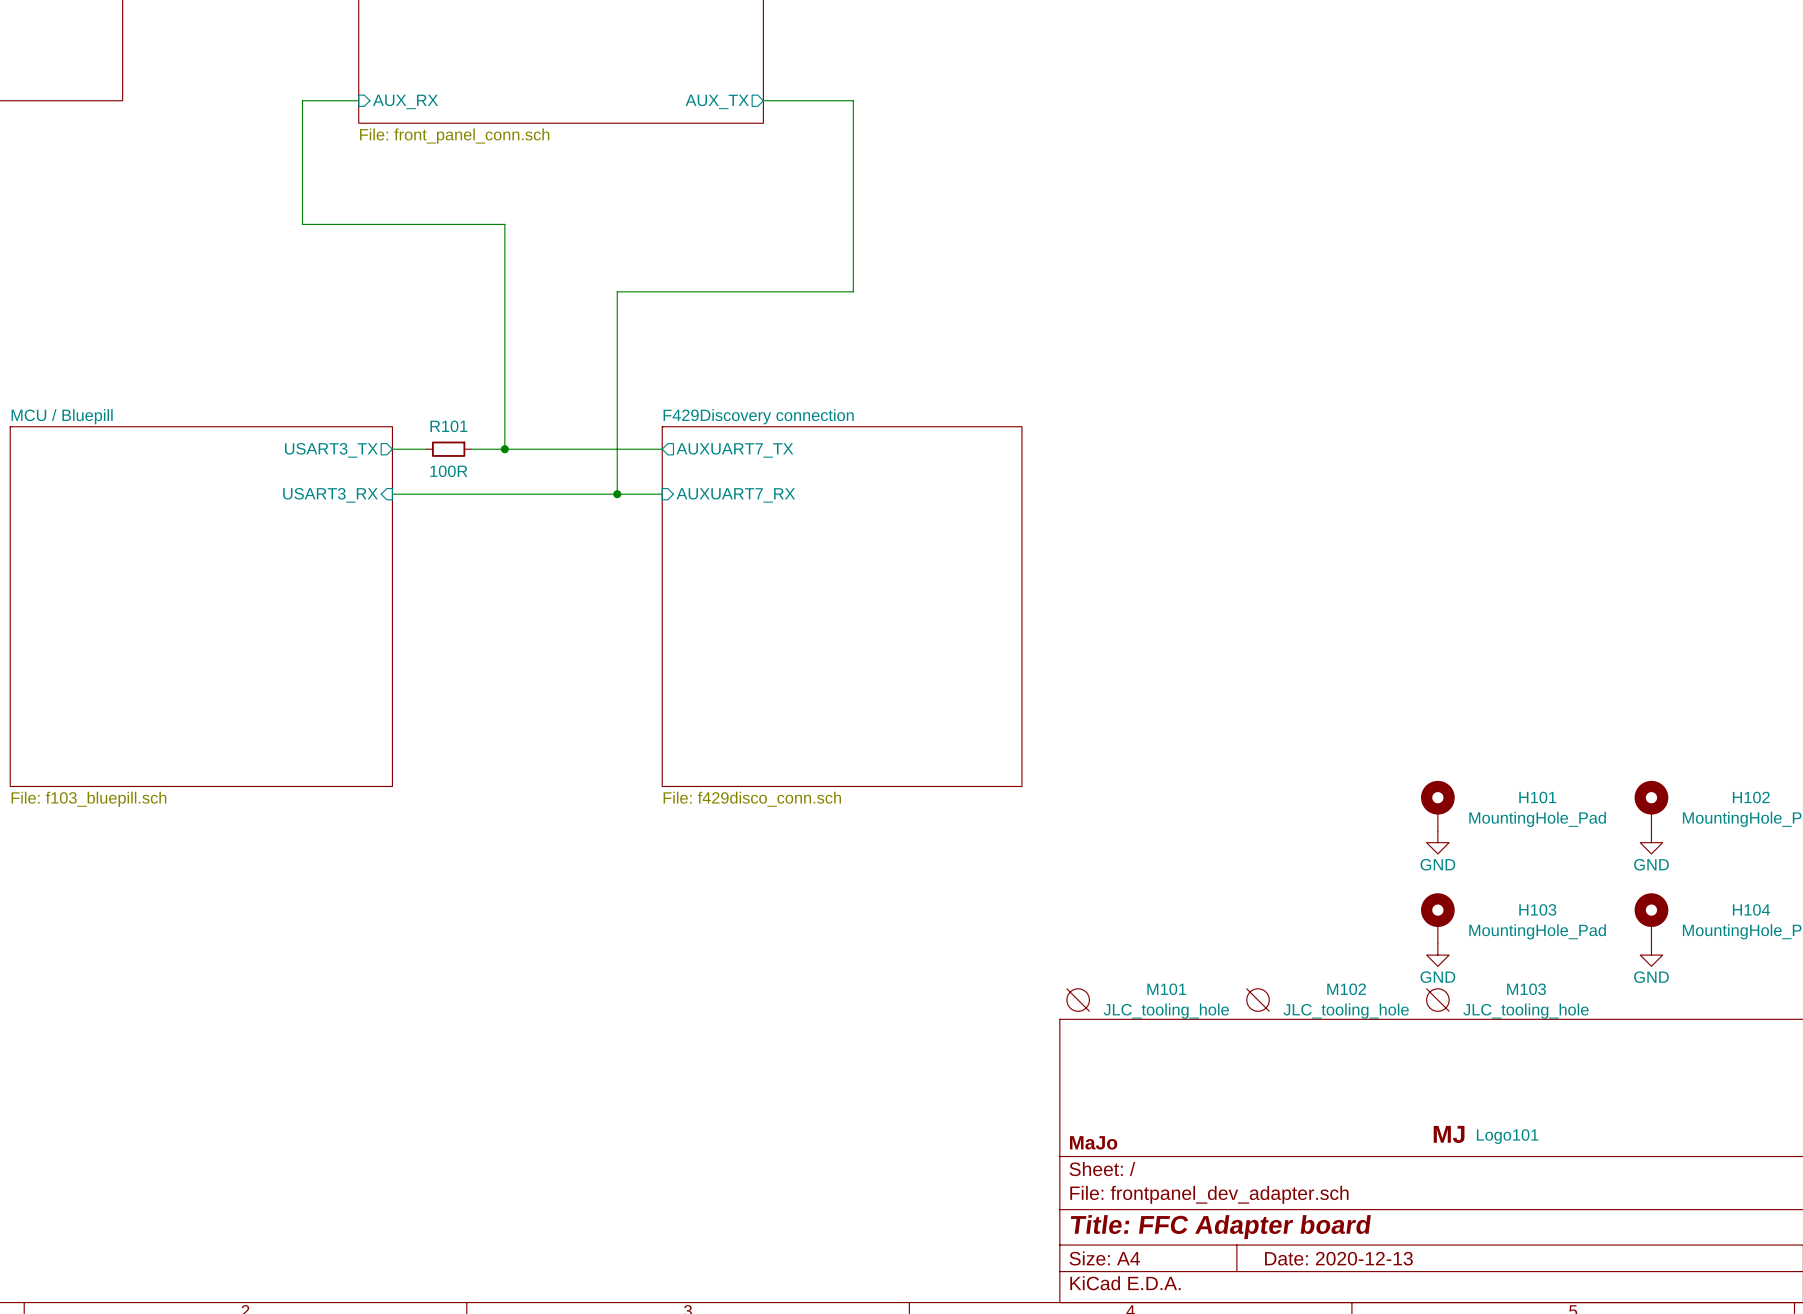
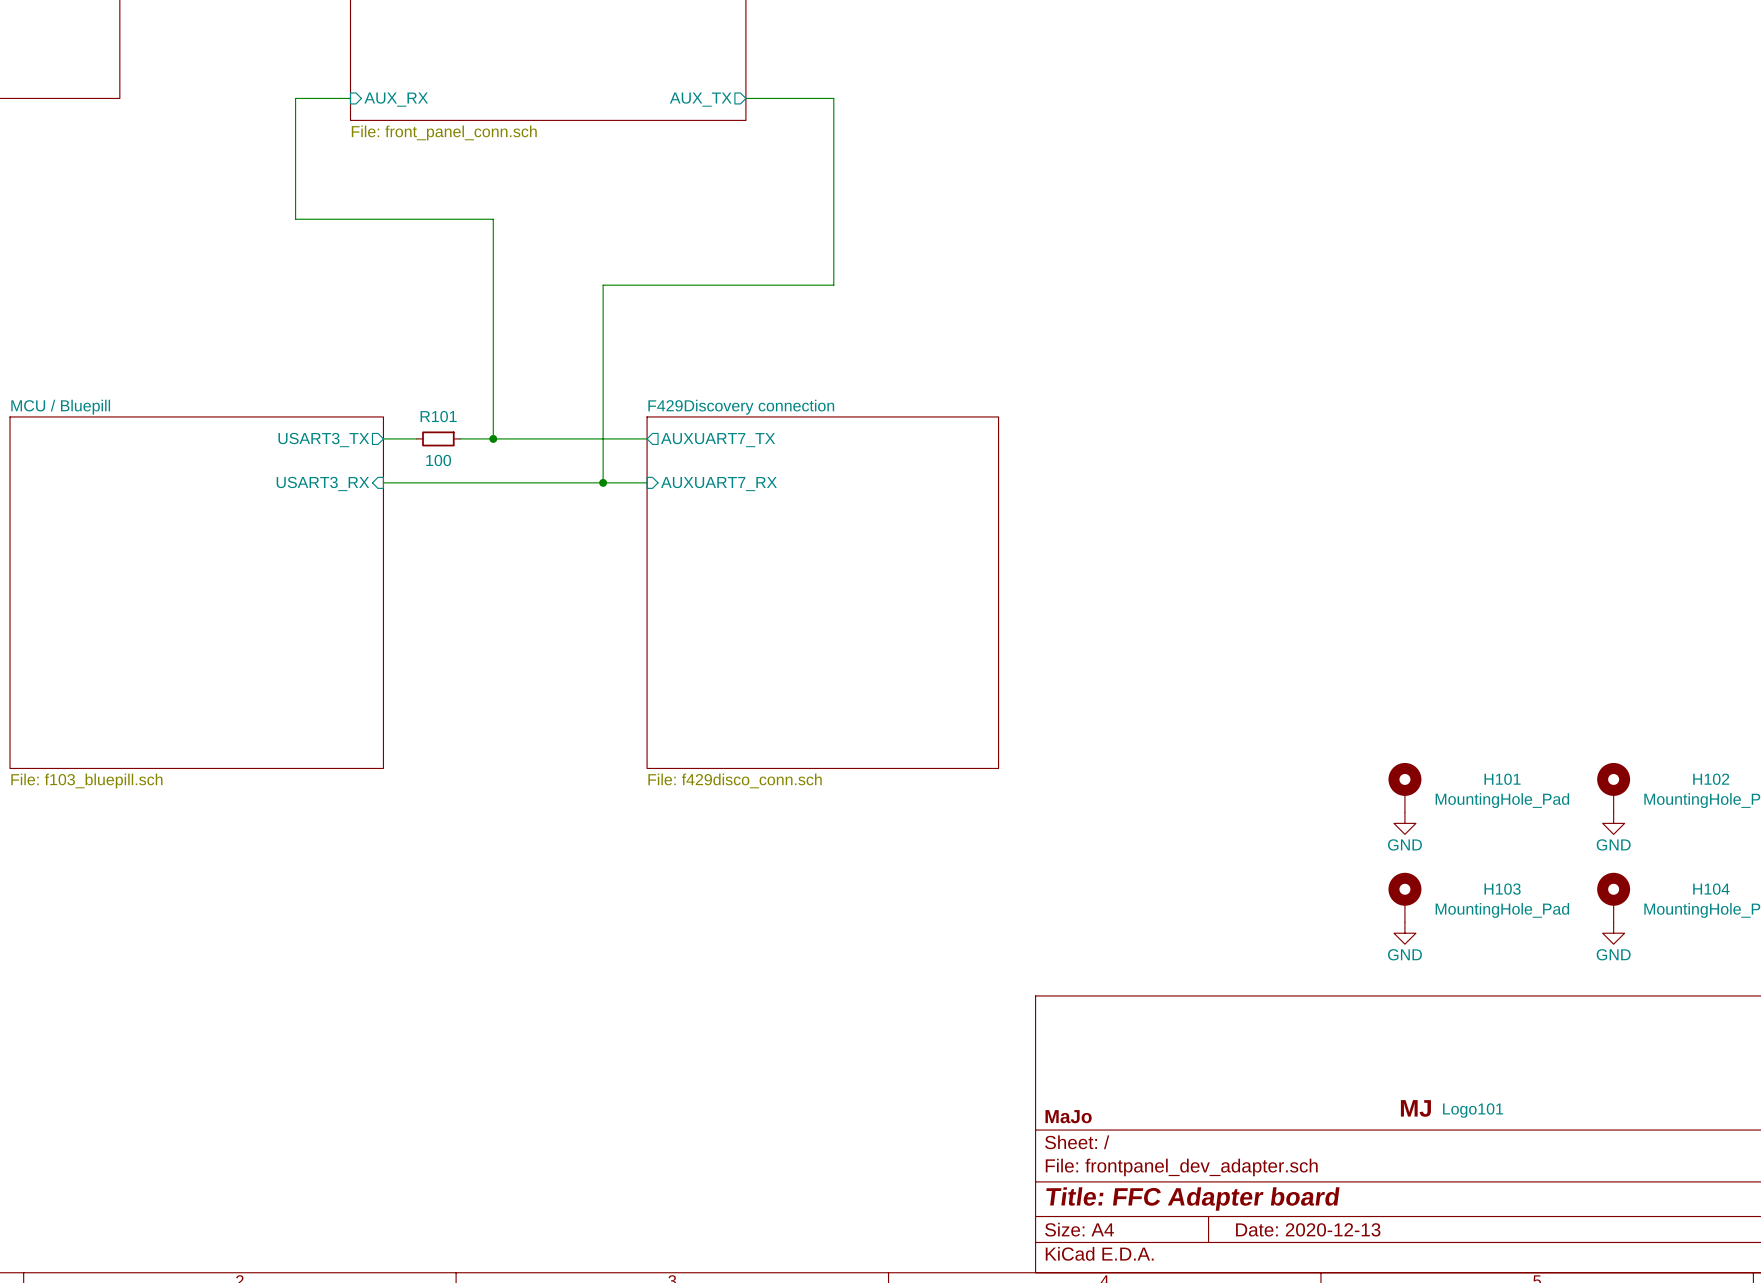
R101 value: 100R (448, 471) -> 100 (438, 460)
M101: JLC_tooling_hole (1078, 1000) -> none
M102: JLC_tooling_hole (1258, 1000) -> none
M103: JLC_tooling_hole (1437, 1000) -> none

